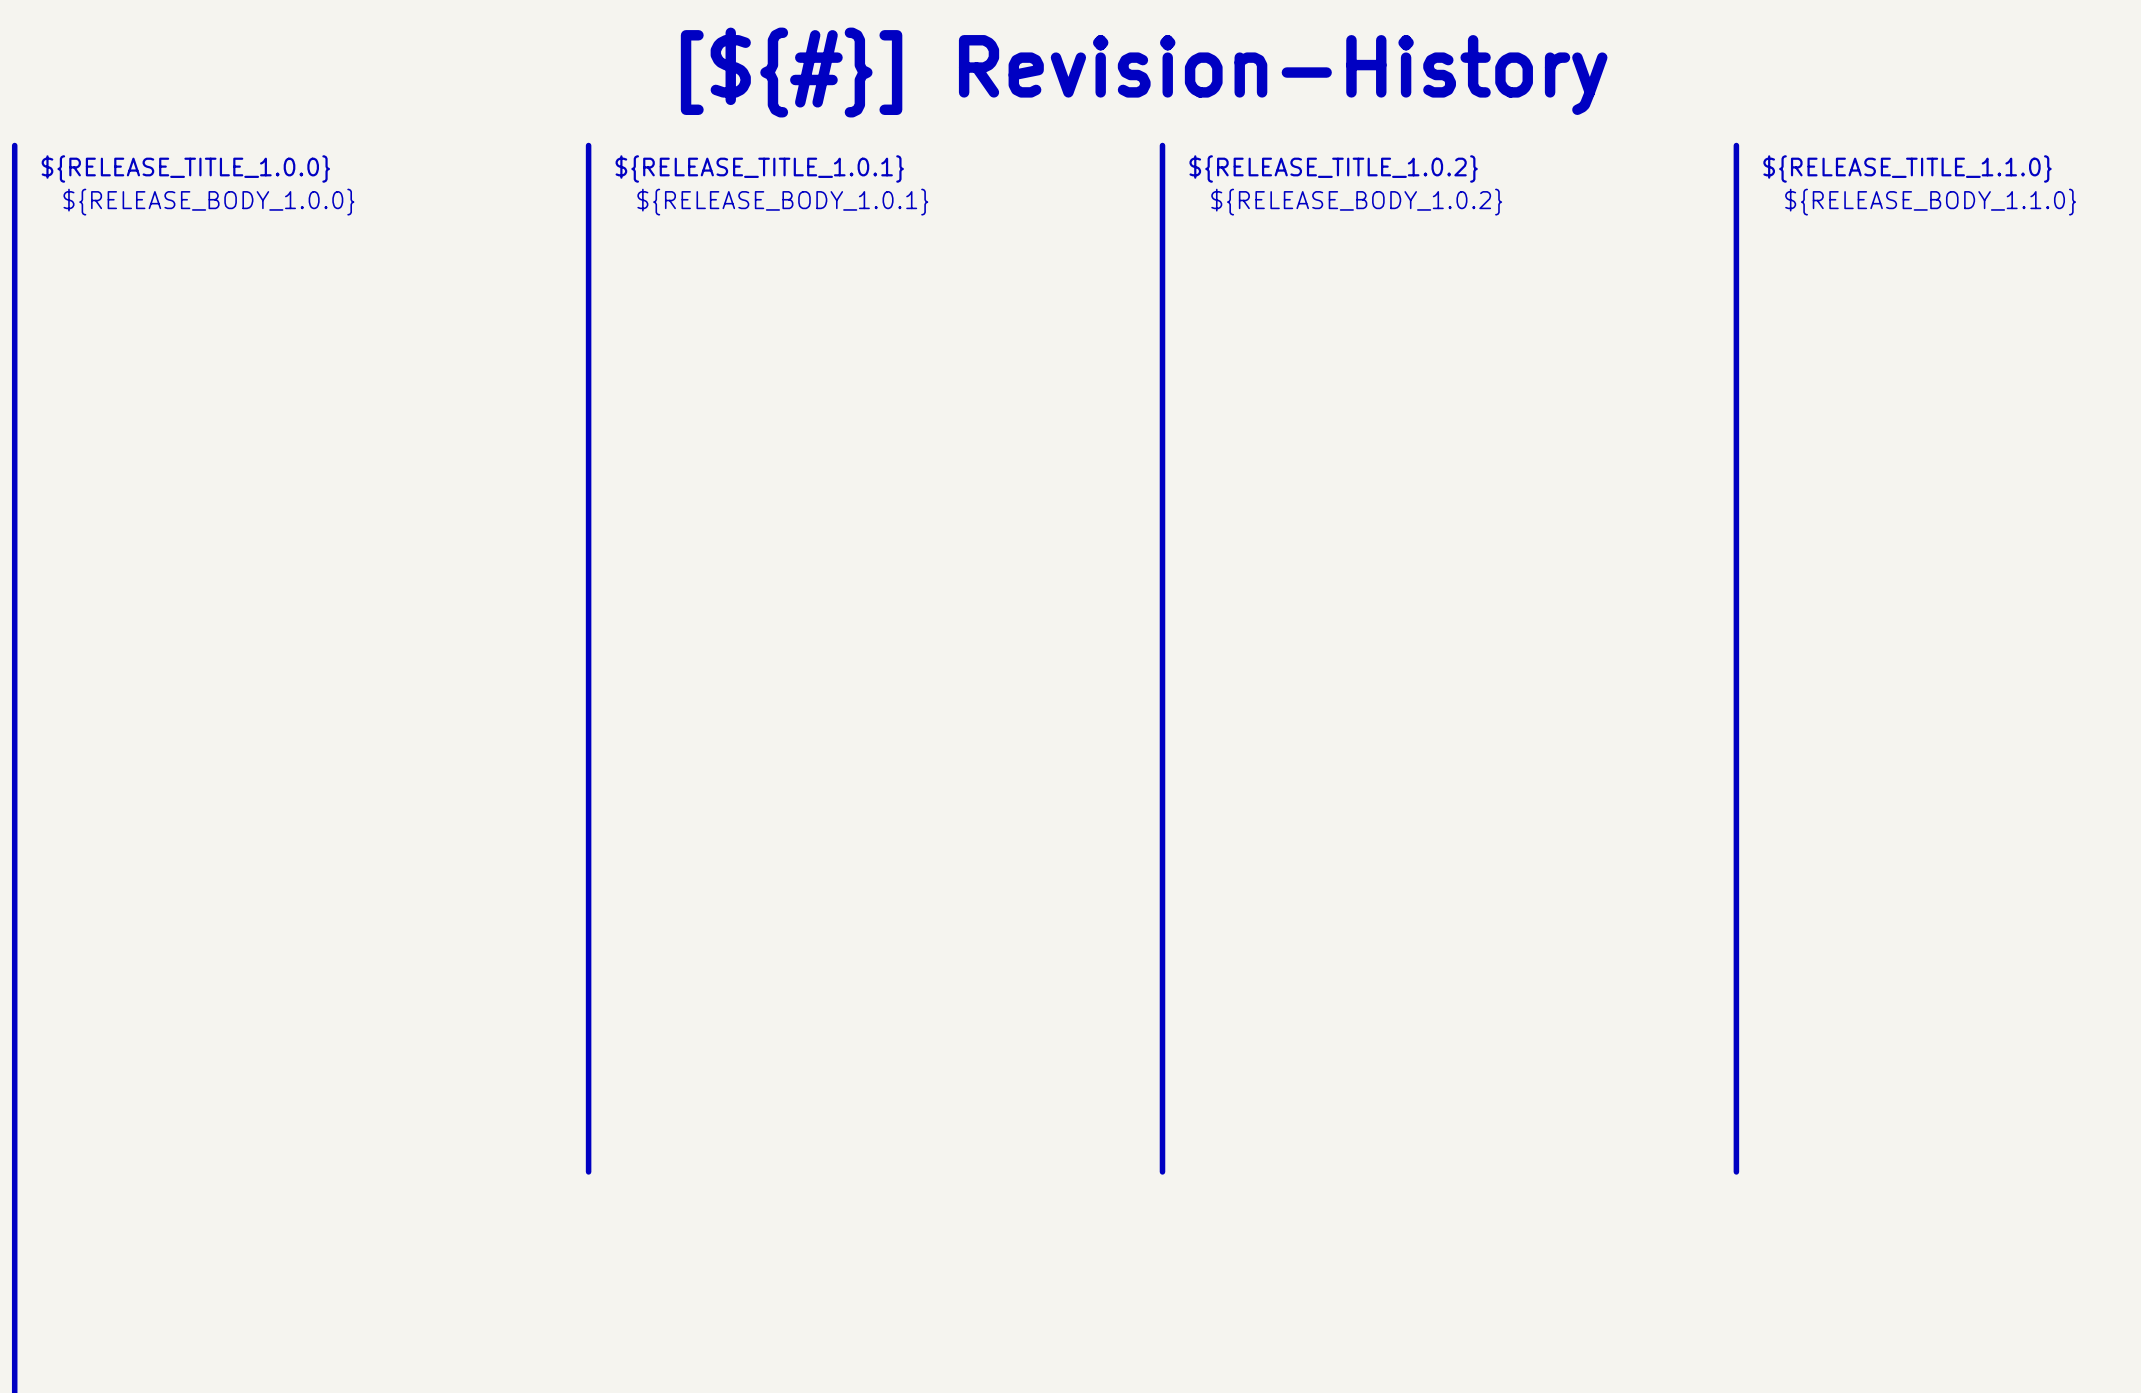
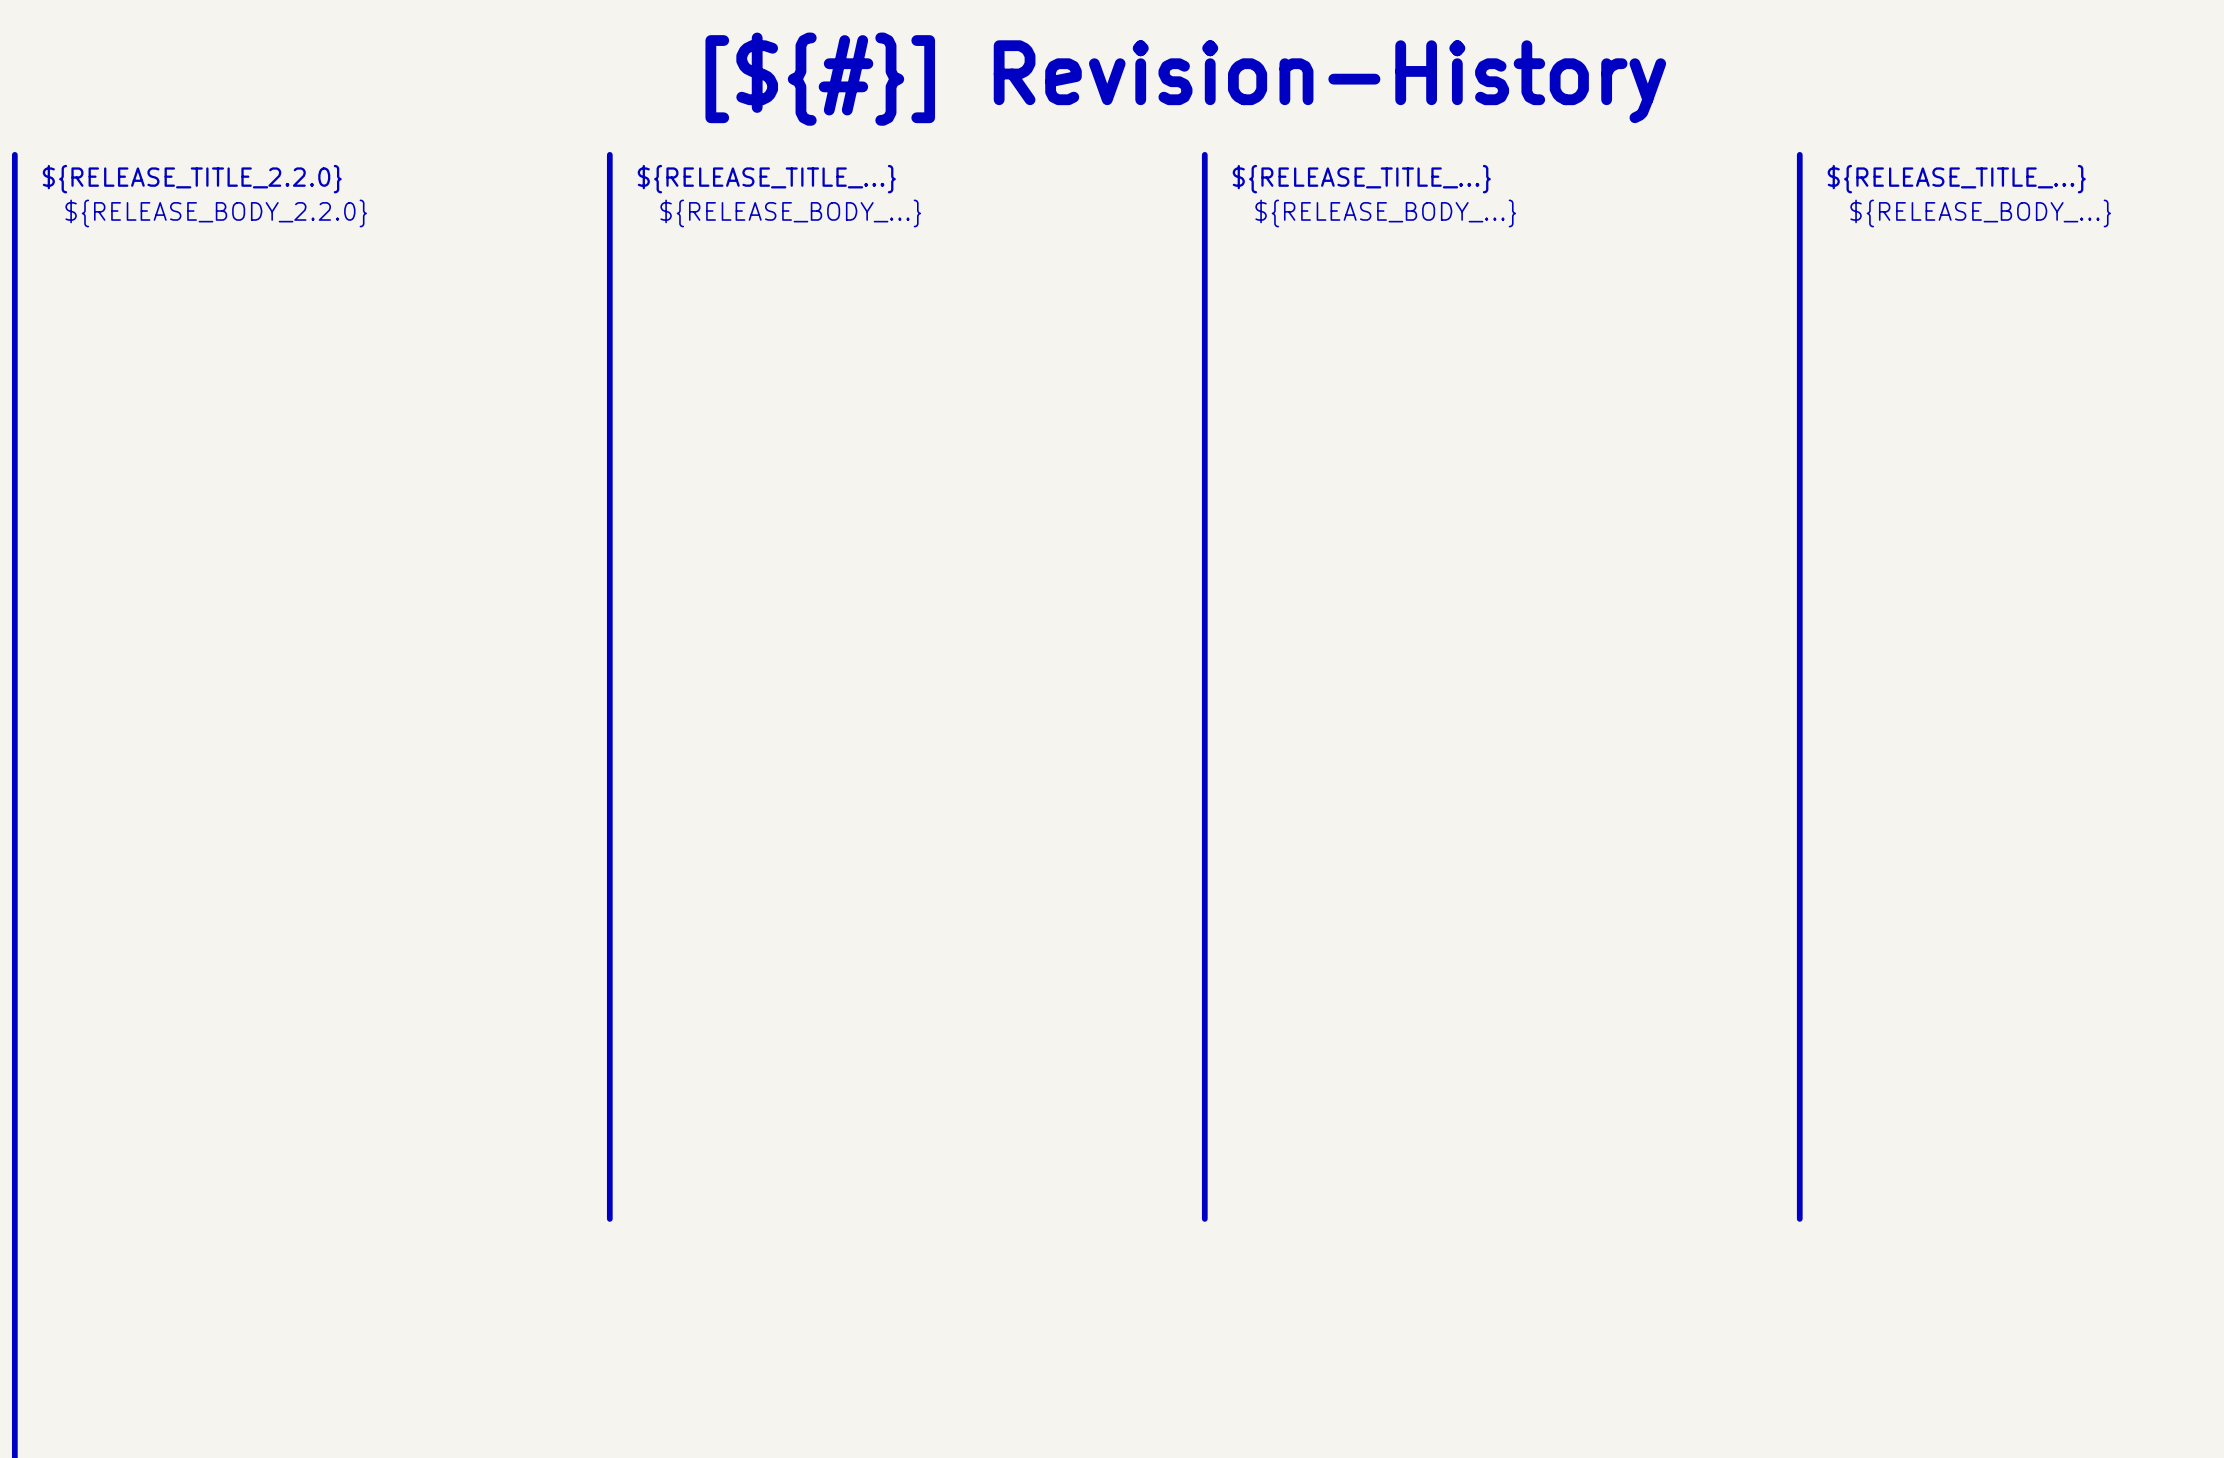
text: ${RELEASE_TITLE_1.0.0} (185, 168) -> ${RELEASE_TITLE_2.2.0} (192, 179)
text: ${RELEASE_TITLE_1.0.1} (759, 168) -> ${RELEASE_TITLE_...} (766, 179)
text: ${RELEASE_TITLE_1.0.2} (1333, 168) -> ${RELEASE_TITLE_...} (1361, 179)
text: ${RELEASE_TITLE_1.1.0} (1907, 168) -> ${RELEASE_TITLE_...} (1956, 179)
text: ${RELEASE_BODY_1.0.0} (208, 202) -> ${RELEASE_BODY_2.2.0} (216, 213)
text: ${RELEASE_BODY_1.0.1} (782, 202) -> ${RELEASE_BODY_...} (790, 213)
text: ${RELEASE_BODY_1.0.2} (1356, 202) -> ${RELEASE_BODY_...} (1385, 213)
text: ${RELEASE_BODY_1.1.0} (1930, 202) -> ${RELEASE_BODY_...} (1980, 213)

